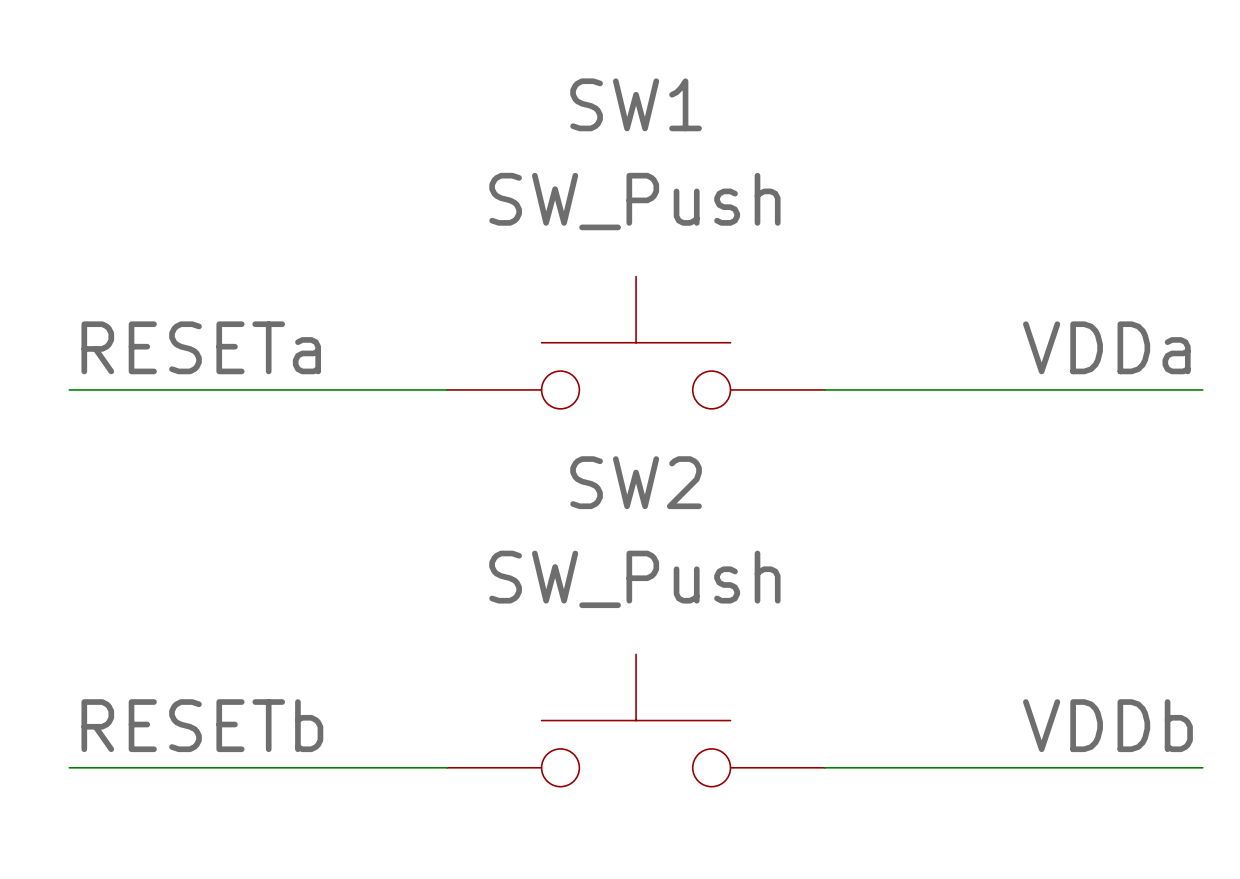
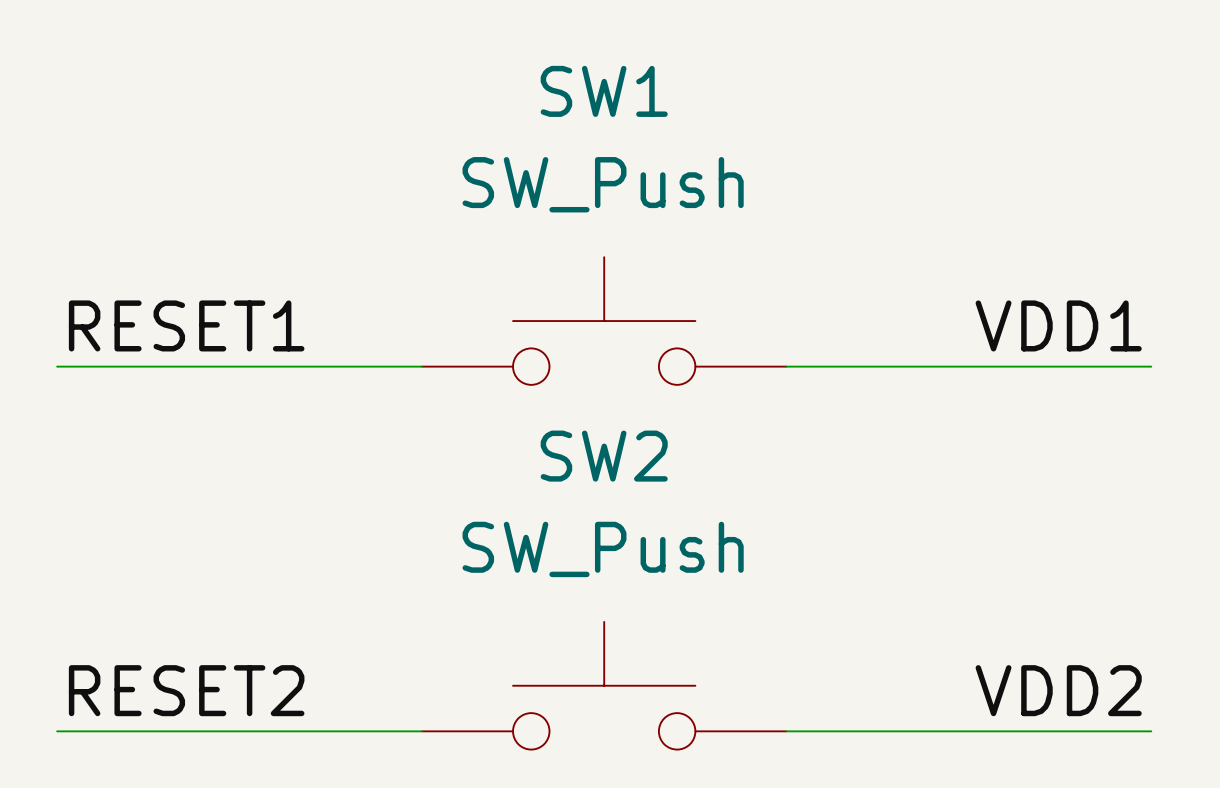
label: RESETa (201, 347) -> RESET1 (186, 325)
label: VDDa (1106, 347) -> VDD1 (1058, 325)
label: RESETb (202, 725) -> RESET2 (186, 690)
label: VDDb (1107, 725) -> VDD2 (1058, 690)

